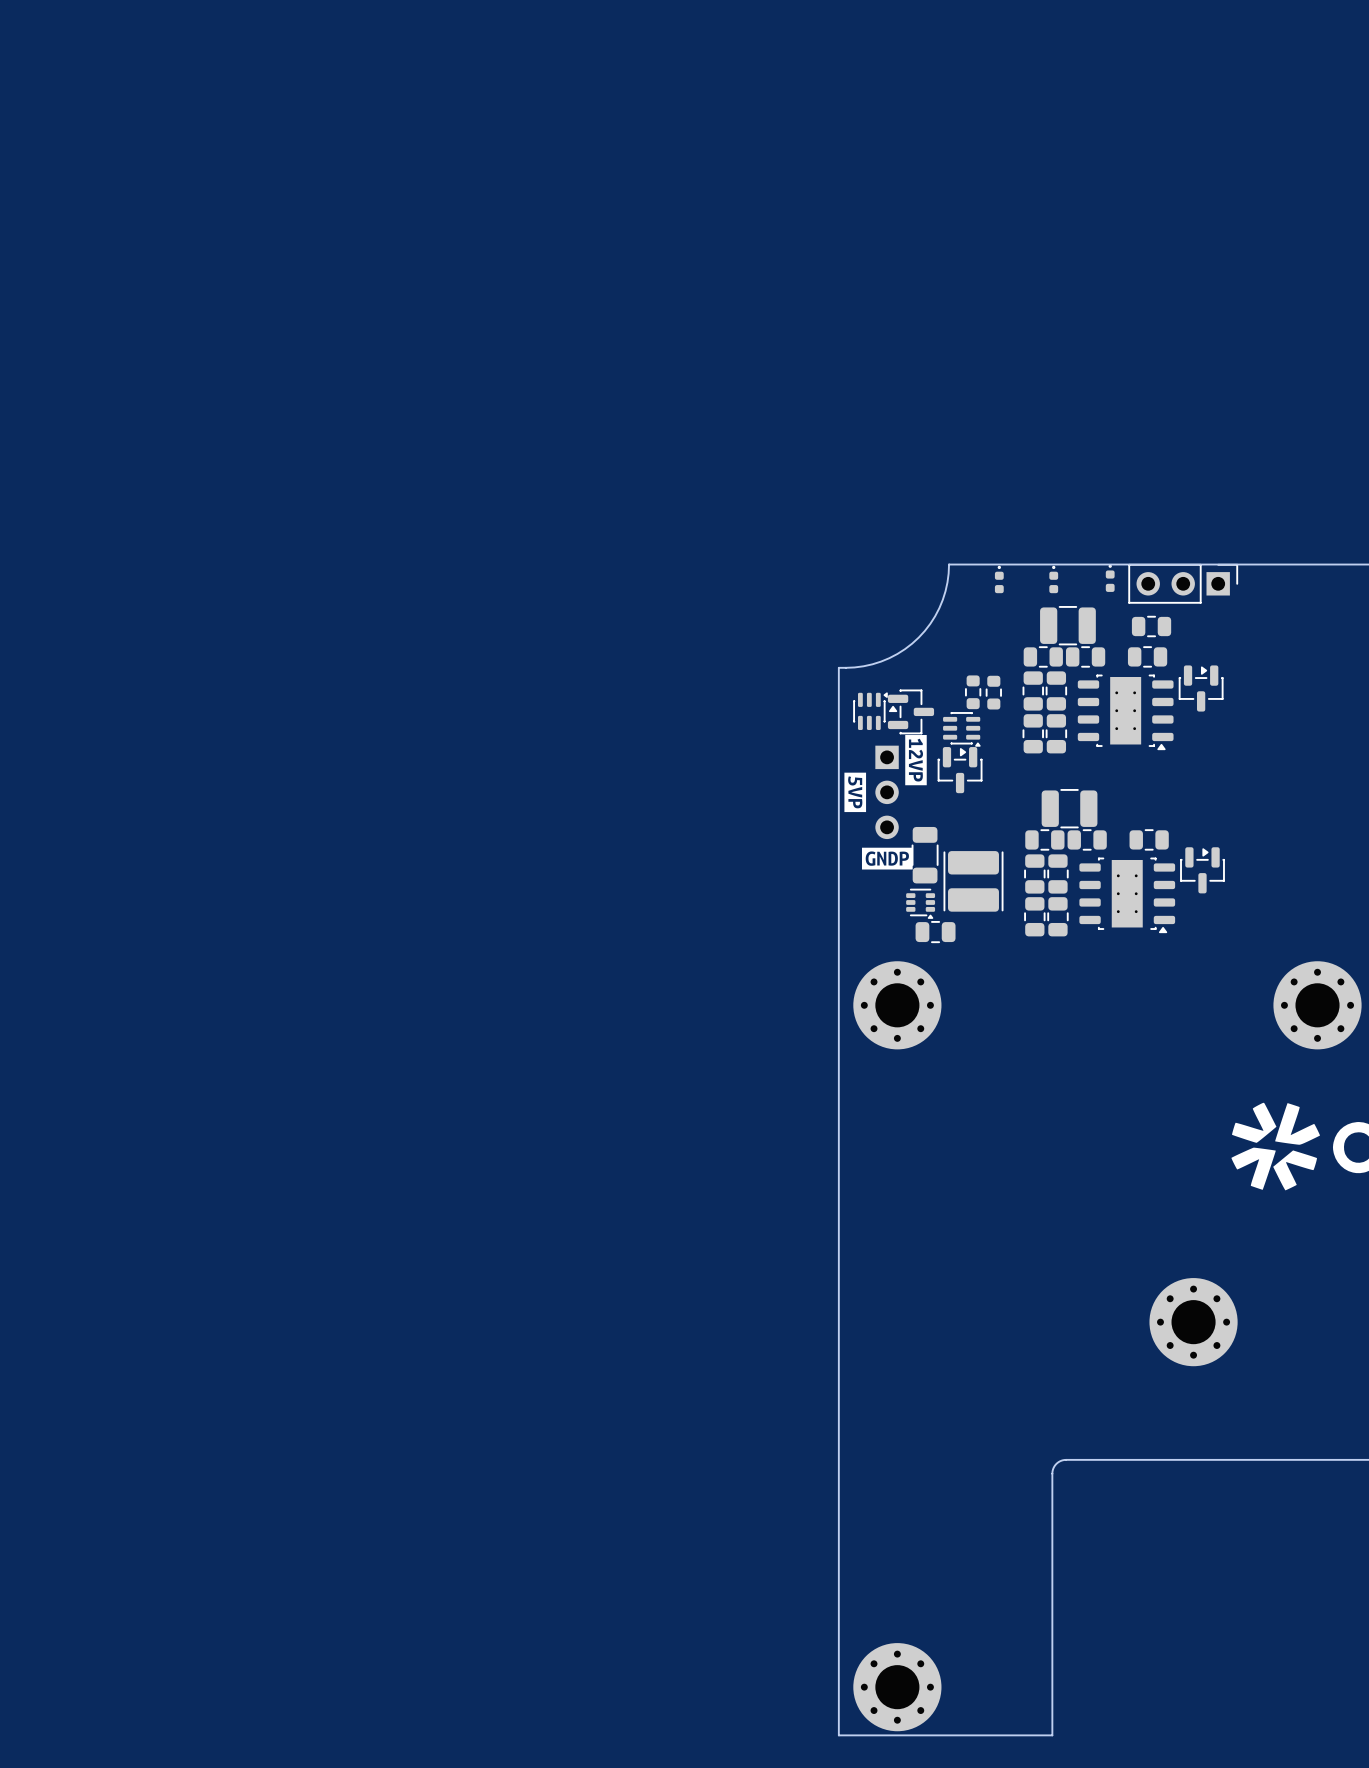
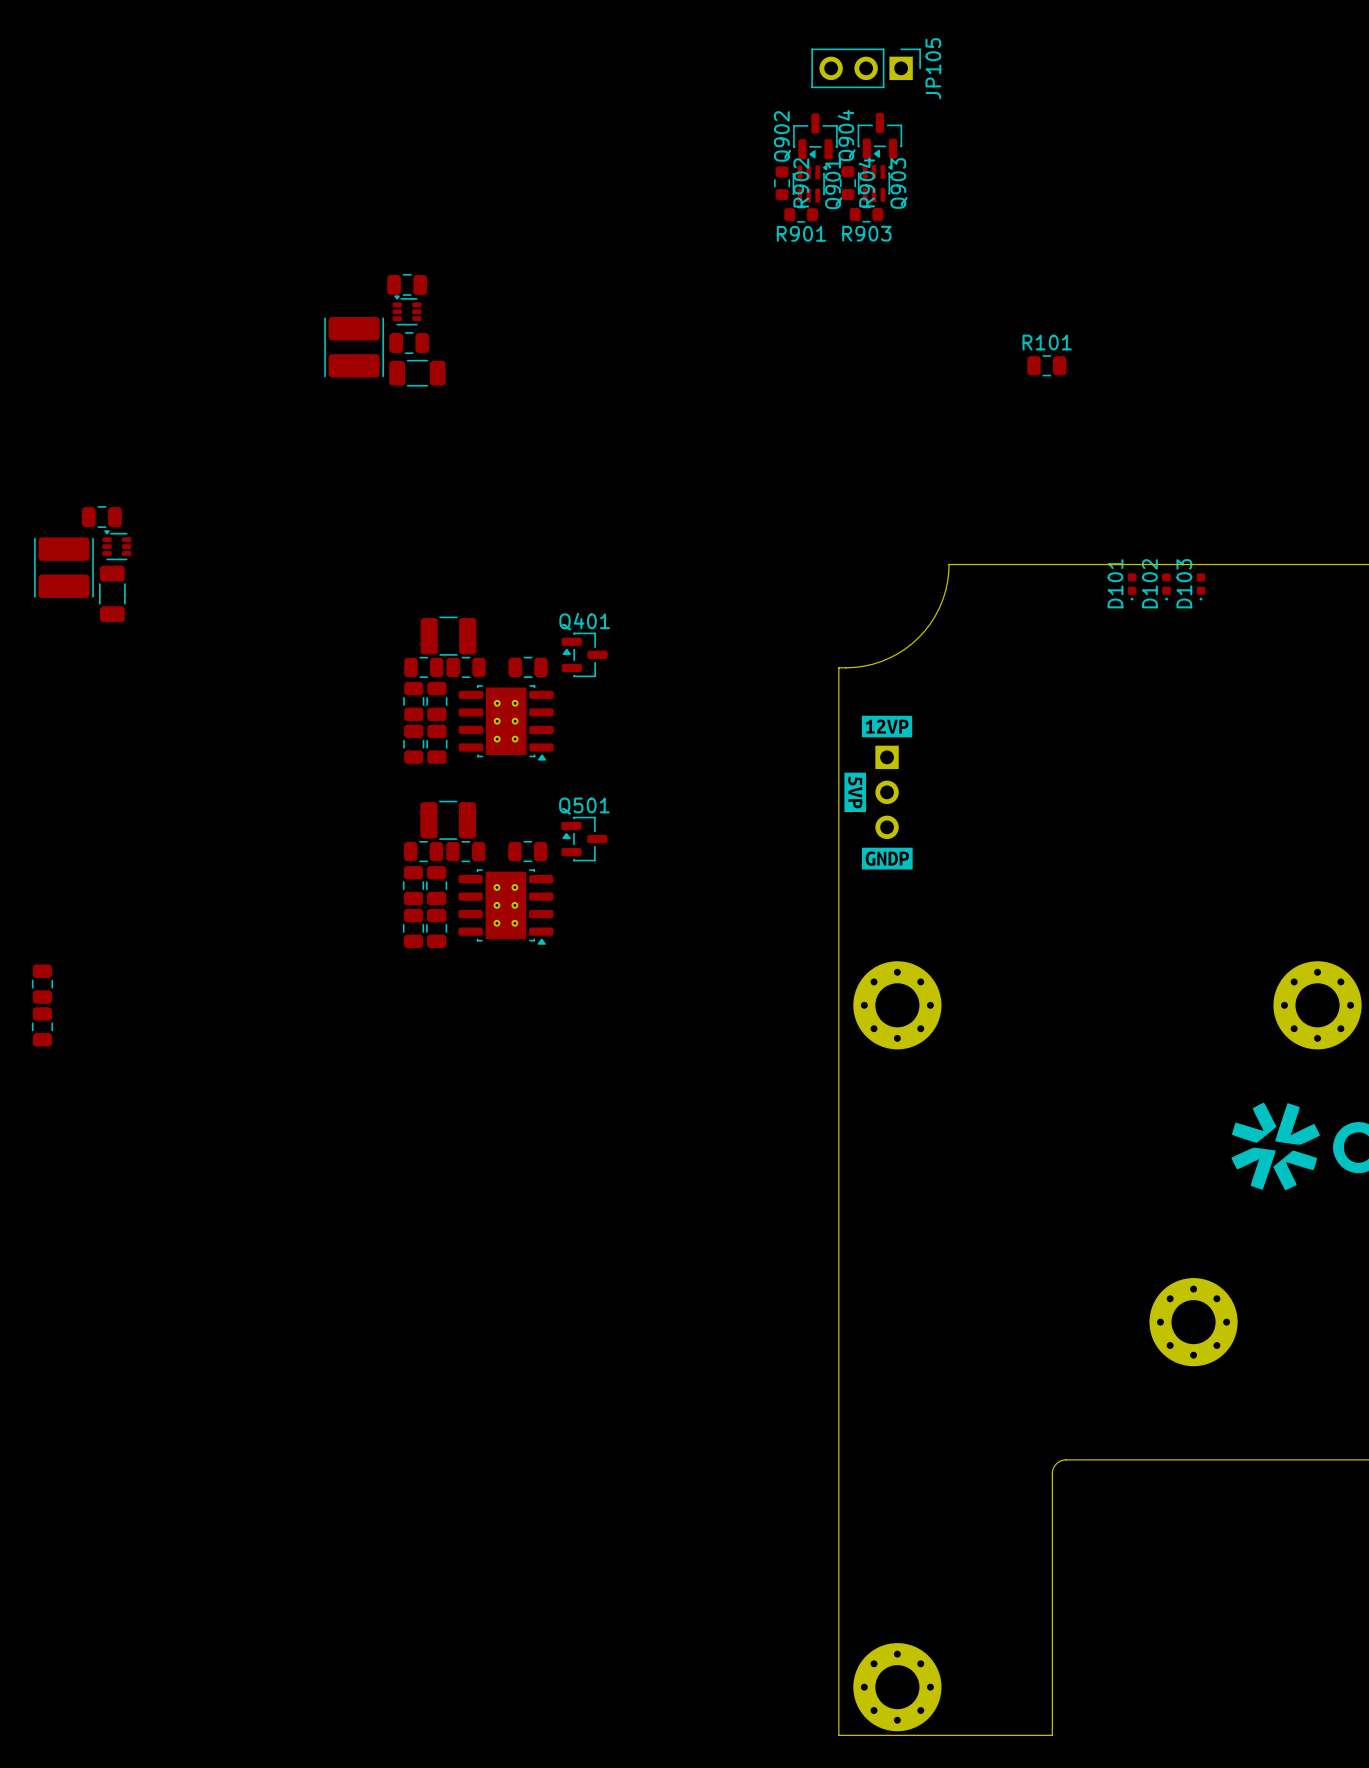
JP105: none -> (866, 68)
Q904: none -> (879, 135)
Q902: none -> (815, 136)
R902: none -> (782, 183)
Q901: none -> (809, 183)
R904: none -> (847, 183)
Q903: none -> (875, 183)
R901: none -> (801, 214)
R903: none -> (866, 214)
part: none -> (407, 284)
part: none -> (407, 310)
part: none -> (409, 343)
part: none -> (354, 347)
R101: none -> (1046, 365)
part: none -> (417, 373)
part: none -> (101, 517)
part: none -> (116, 545)
part: none -> (63, 567)
part: (1110, 578) -> none
part: (999, 579) -> none
part: (1053, 579) -> none
part: (1183, 583) -> none
D101: none -> (1132, 586)
D102: none -> (1166, 586)
D103: none -> (1200, 586)
part: none -> (112, 593)
part: (1067, 625) -> none
part: (1151, 626) -> none
part: none -> (448, 636)
Q401: none -> (584, 654)
part: (1043, 656) -> none
part: (1085, 656) -> none
part: (1147, 656) -> none
part: none -> (423, 667)
part: none -> (466, 667)
part: none -> (528, 667)
part: (1201, 688) -> none
part: (1033, 690) -> none
part: (1056, 690) -> none
part: (973, 692) -> none
part: (993, 692) -> none
part: none -> (413, 701)
part: none -> (436, 701)
part: (870, 711) -> none
part: (910, 711) -> none
part: (1125, 712) -> none
drawing: none -> [861, 715, 913, 738]
part: none -> (506, 722)
part: (961, 729) -> none
part: (1033, 733) -> none
part: (1056, 733) -> none
drawing: [905, 735, 927, 786] -> none
part: none -> (413, 744)
part: none -> (436, 744)
part: (960, 770) -> none
part: (1069, 808) -> none
part: none -> (448, 820)
Q501: none -> (584, 839)
part: (1044, 839) -> none
part: (1087, 839) -> none
part: (1149, 839) -> none
part: none -> (423, 851)
part: none -> (465, 851)
part: none -> (527, 851)
part: (925, 855) -> none
part: (1202, 870) -> none
part: (1034, 873) -> none
part: (1057, 873) -> none
part: (973, 881) -> none
part: none -> (413, 885)
part: none -> (436, 885)
part: (1127, 895) -> none
part: (920, 903) -> none
part: none -> (505, 907)
part: (1034, 916) -> none
part: (1057, 916) -> none
part: none -> (413, 928)
part: none -> (436, 928)
part: (935, 932) -> none
part: none -> (42, 984)
part: none -> (42, 1026)

